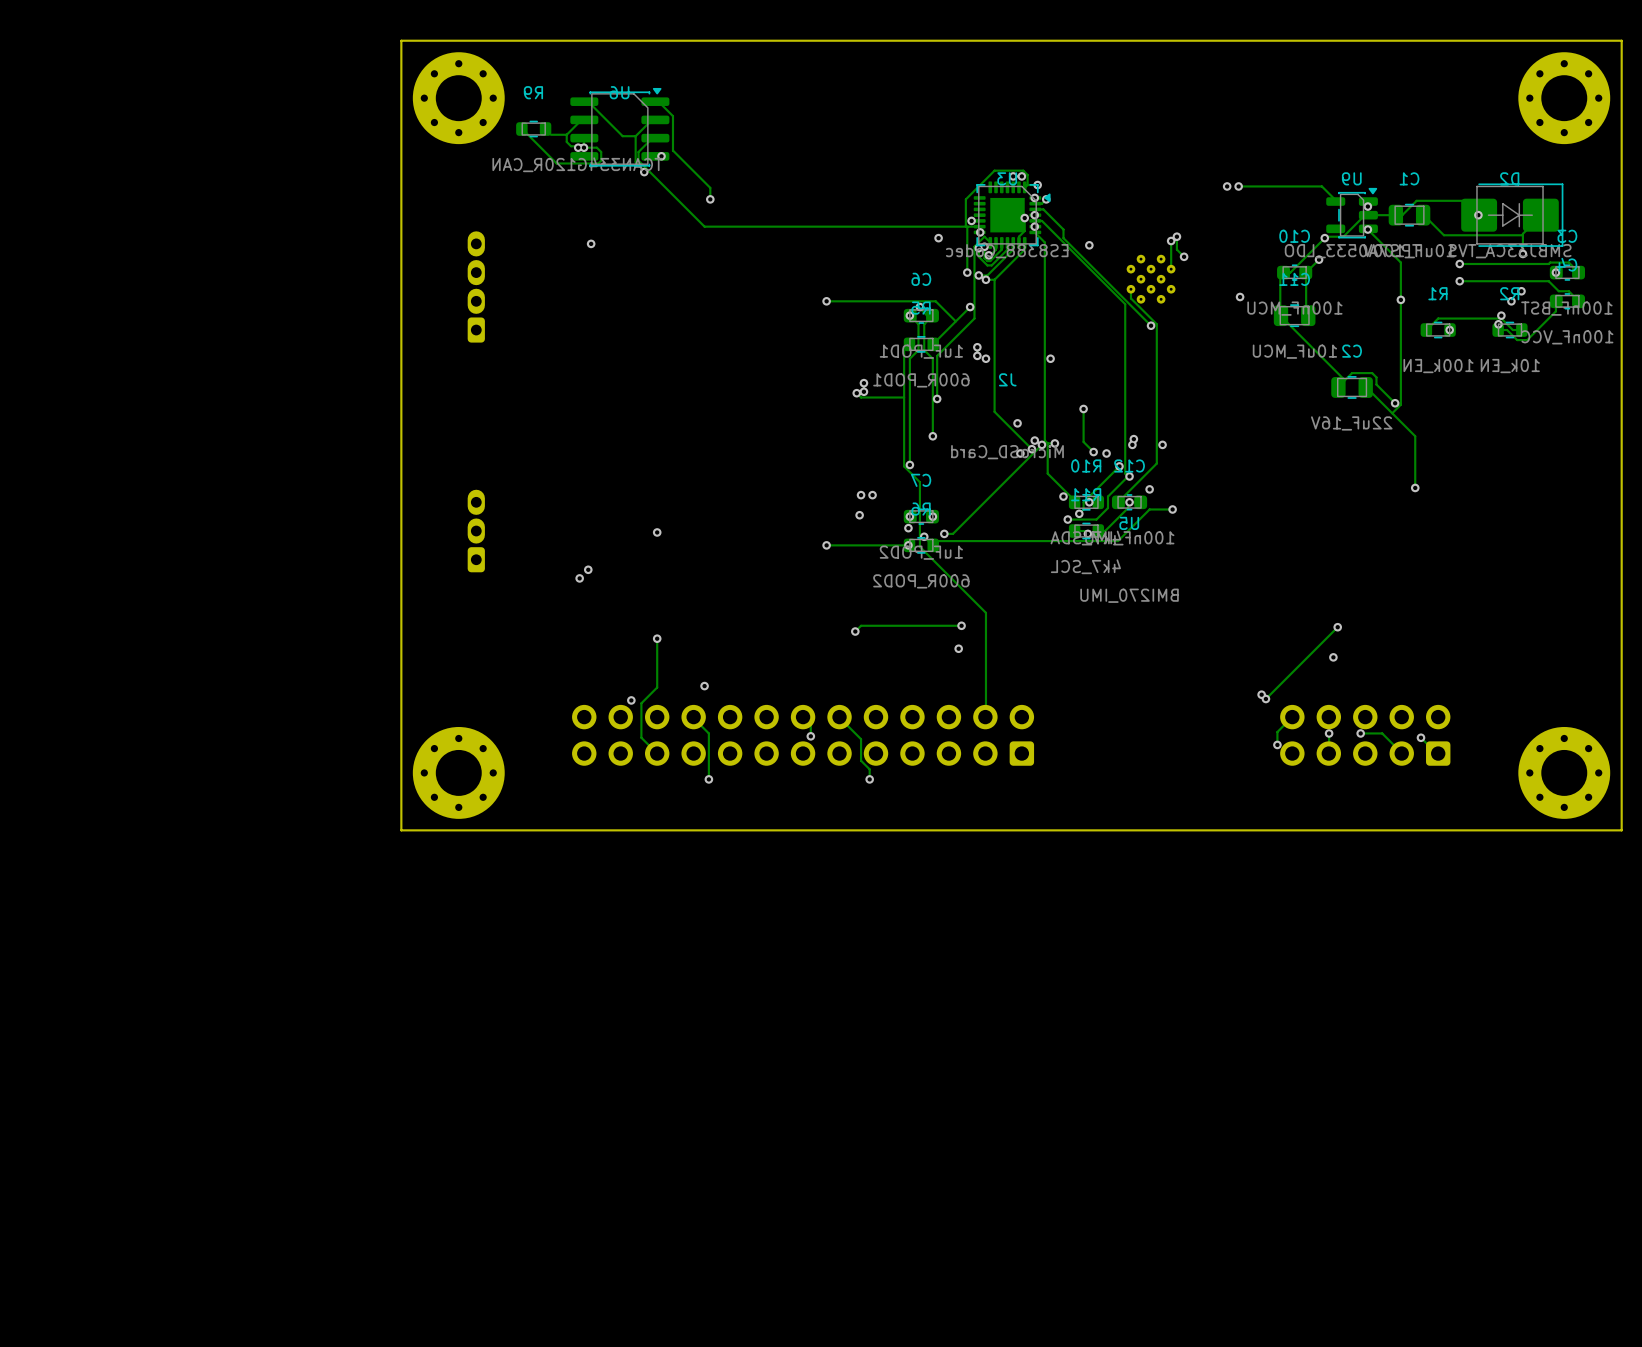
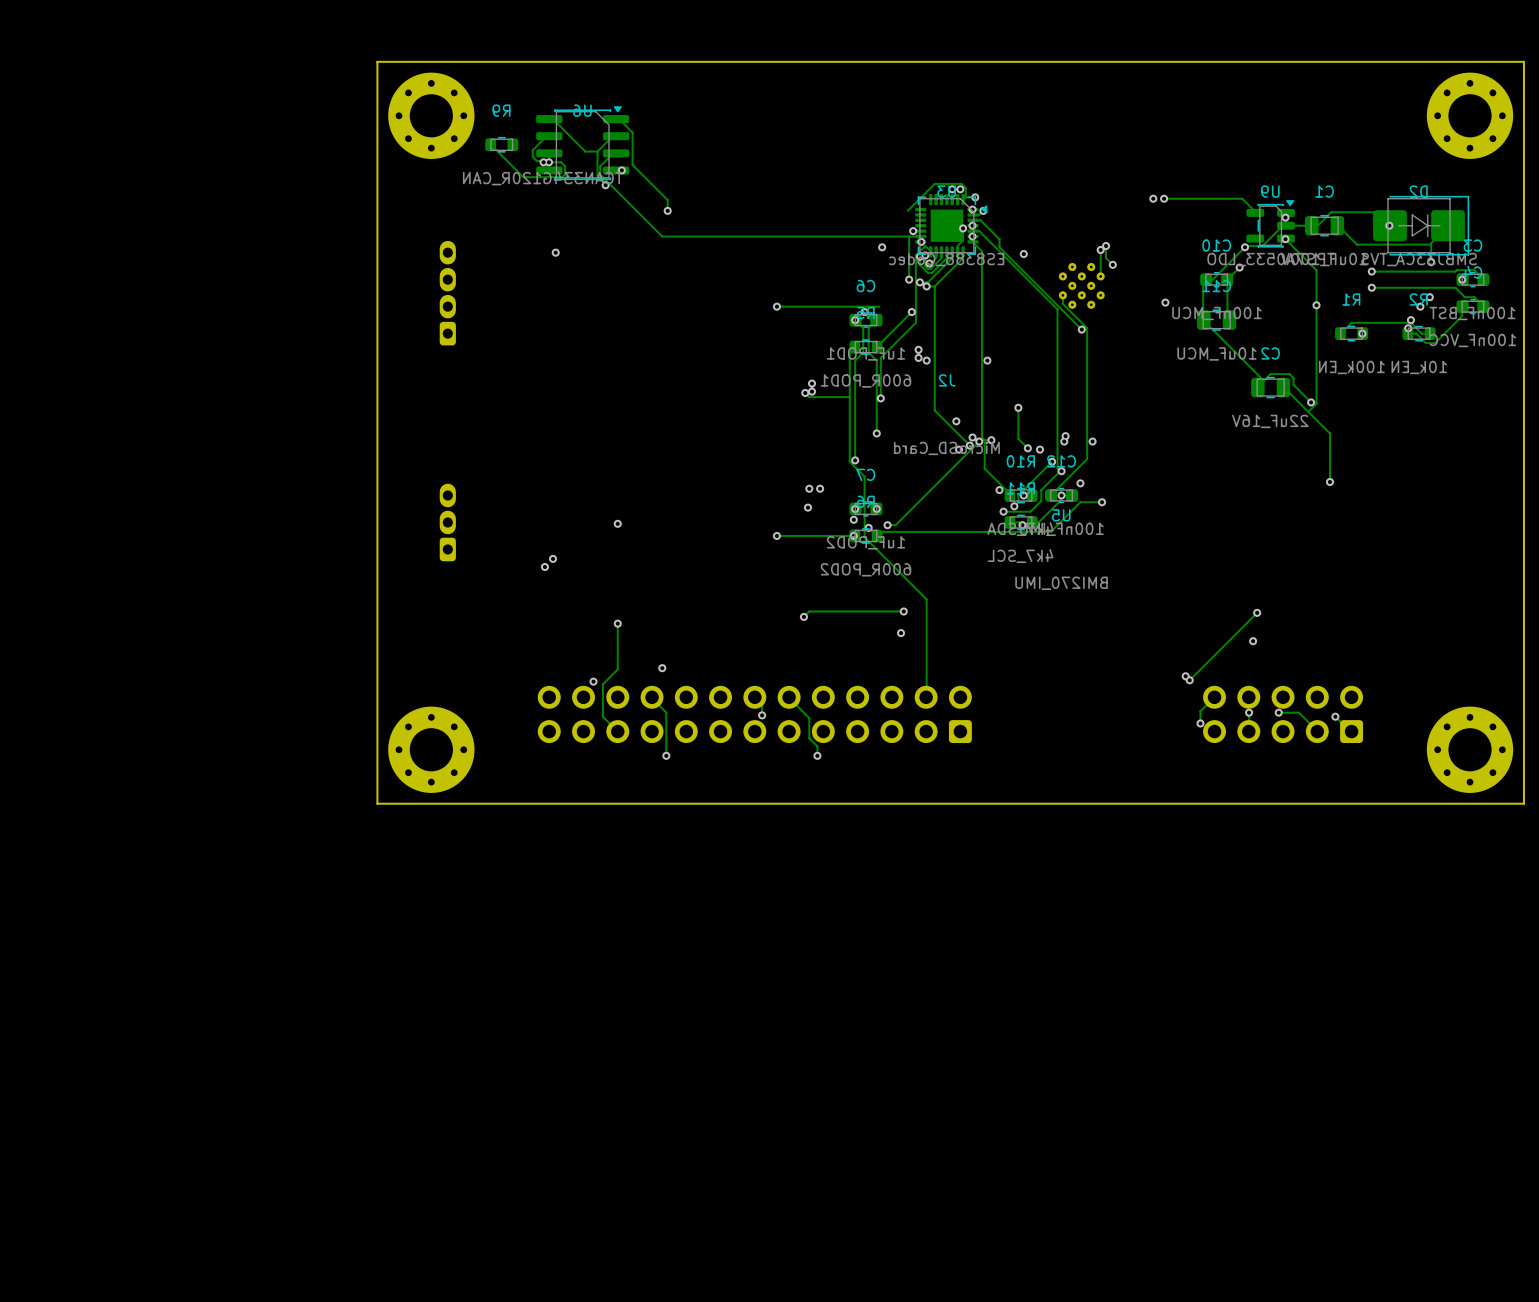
track: (566, 134) (550, 134) -> none
track: (965, 199) (965, 226) -> none
track: (935, 301) (955, 321) -> none

